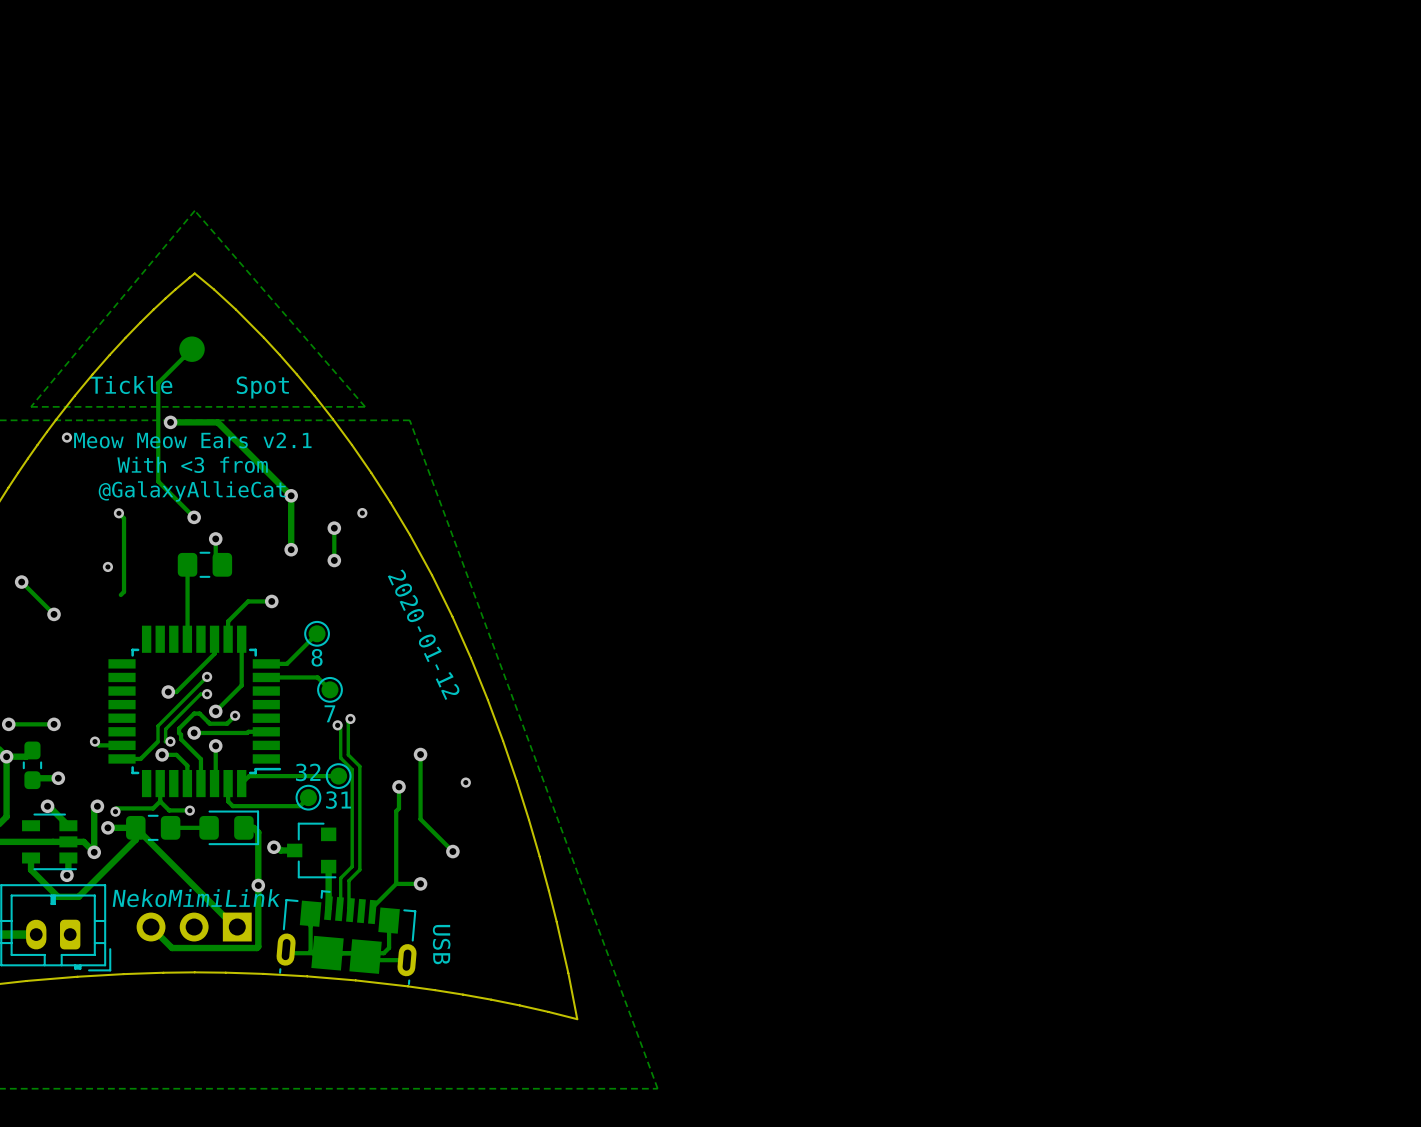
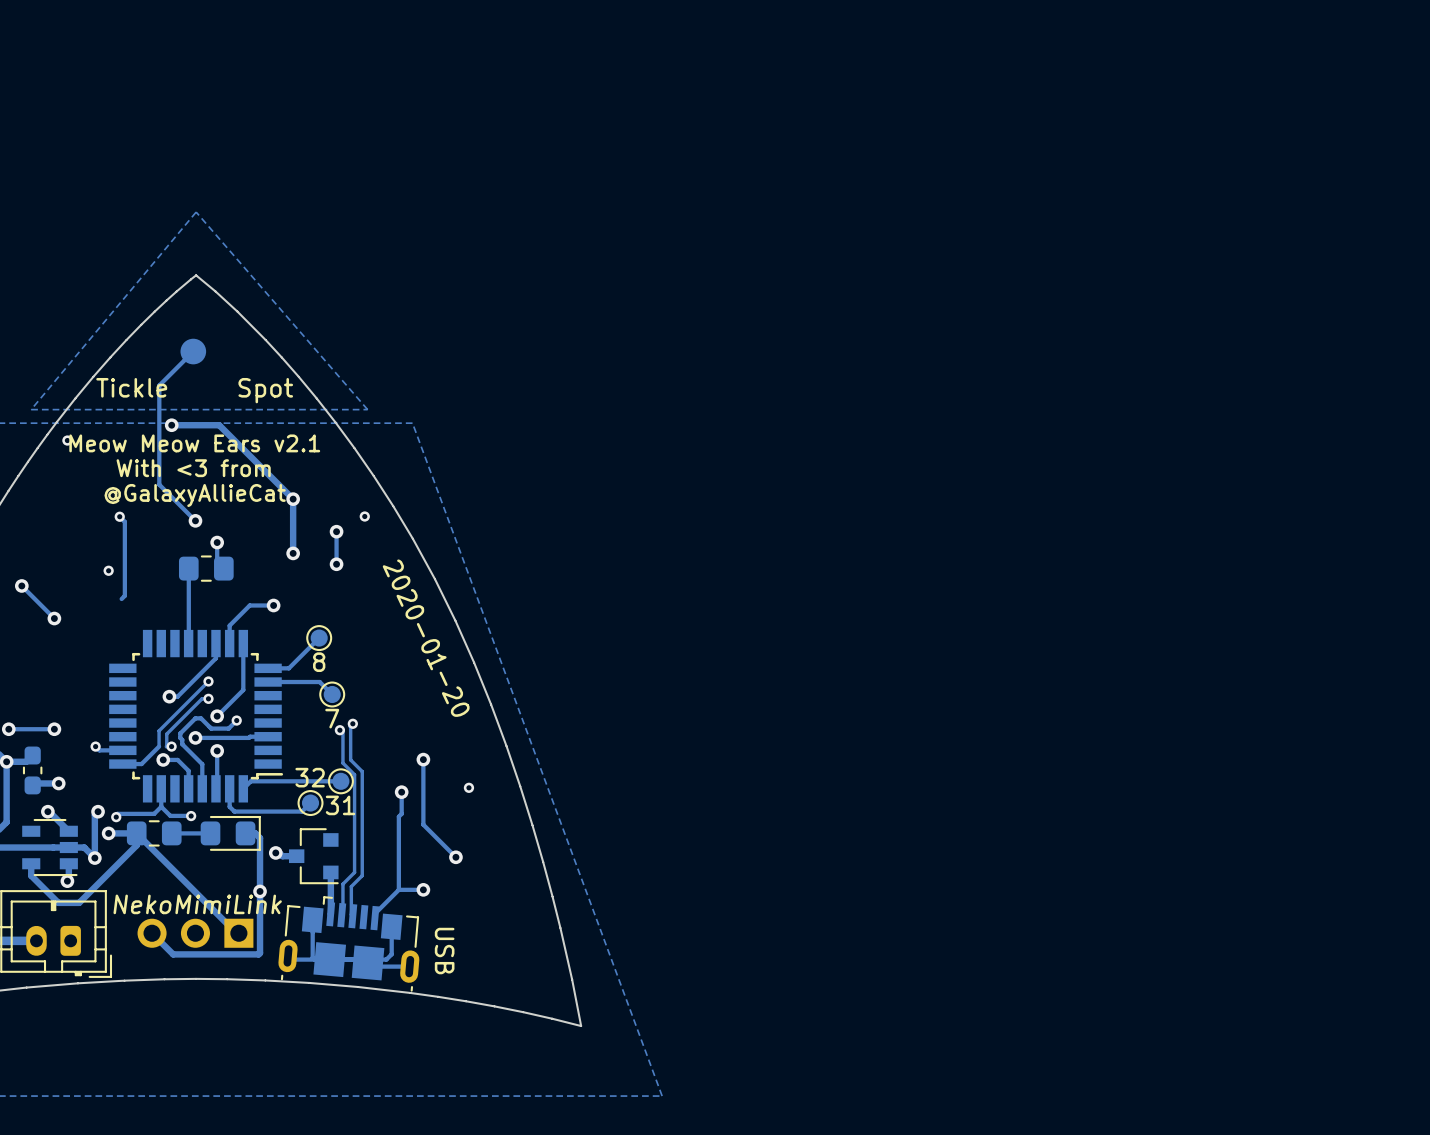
text: 2020-01-12 (423, 634) -> 2020-01-20 (426, 638)

